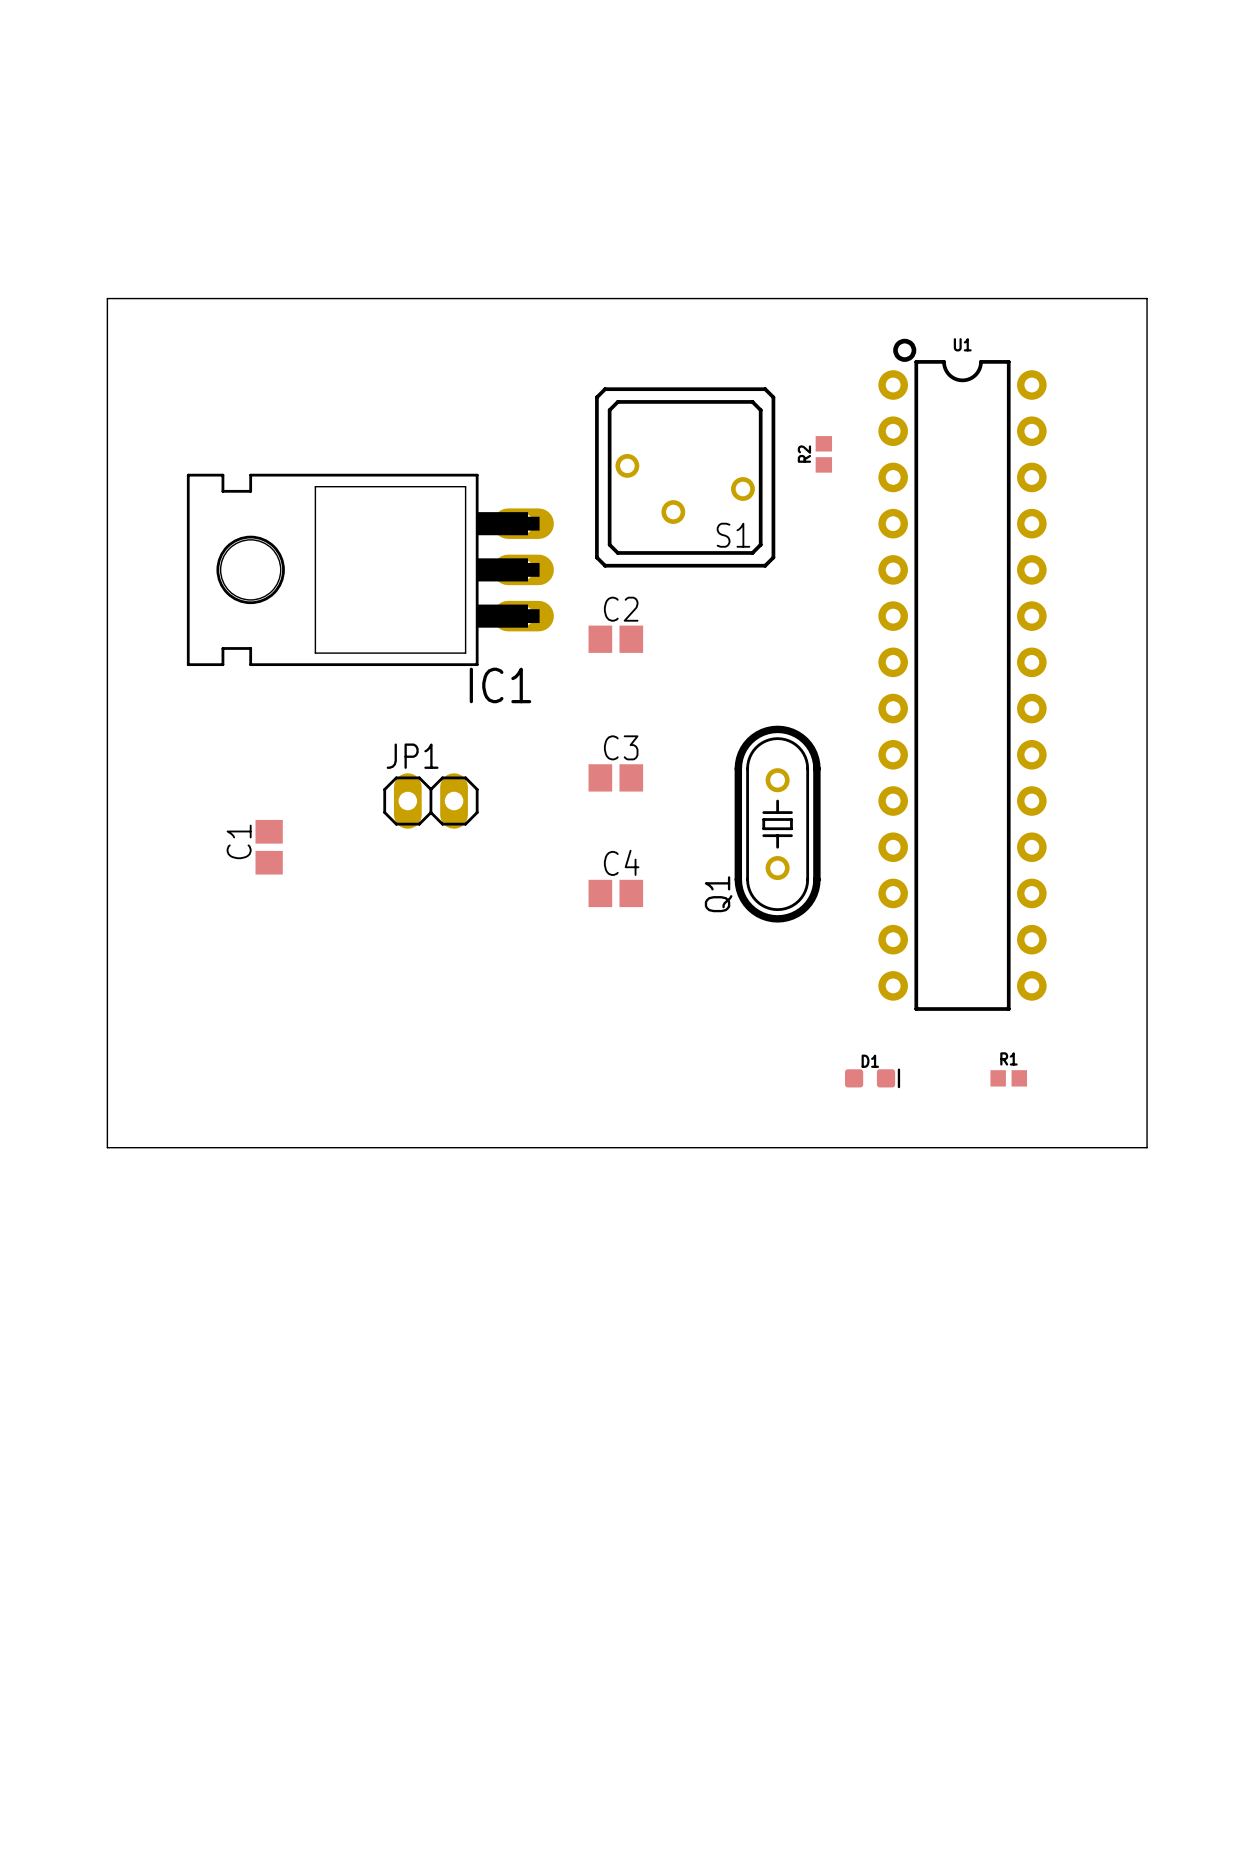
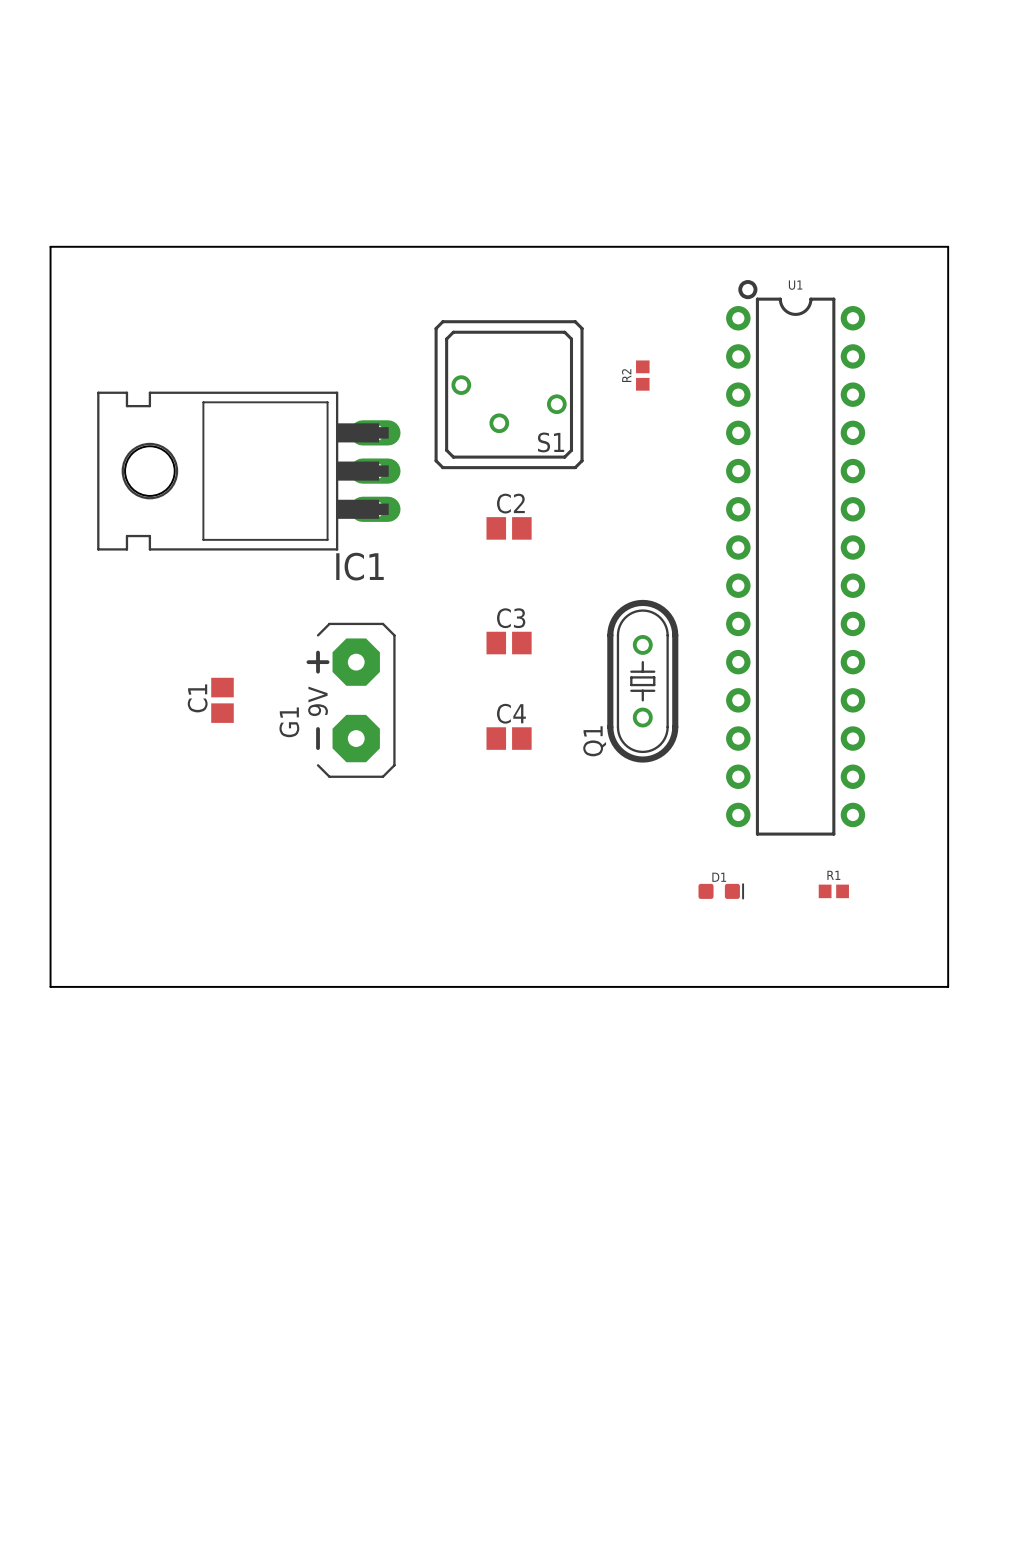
board edge: (107, 298) (107, 1147) (1147, 1147) -> (88, 246) (50, 246) (50, 986) (948, 986) (948, 948)
R2 position: (823, 454) -> (642, 375)
S1 position: (685, 477) -> (509, 394)
IC1 position: (370, 569) -> (248, 471)
JP1: (430, 801) -> none
G1: none -> (351, 700)

